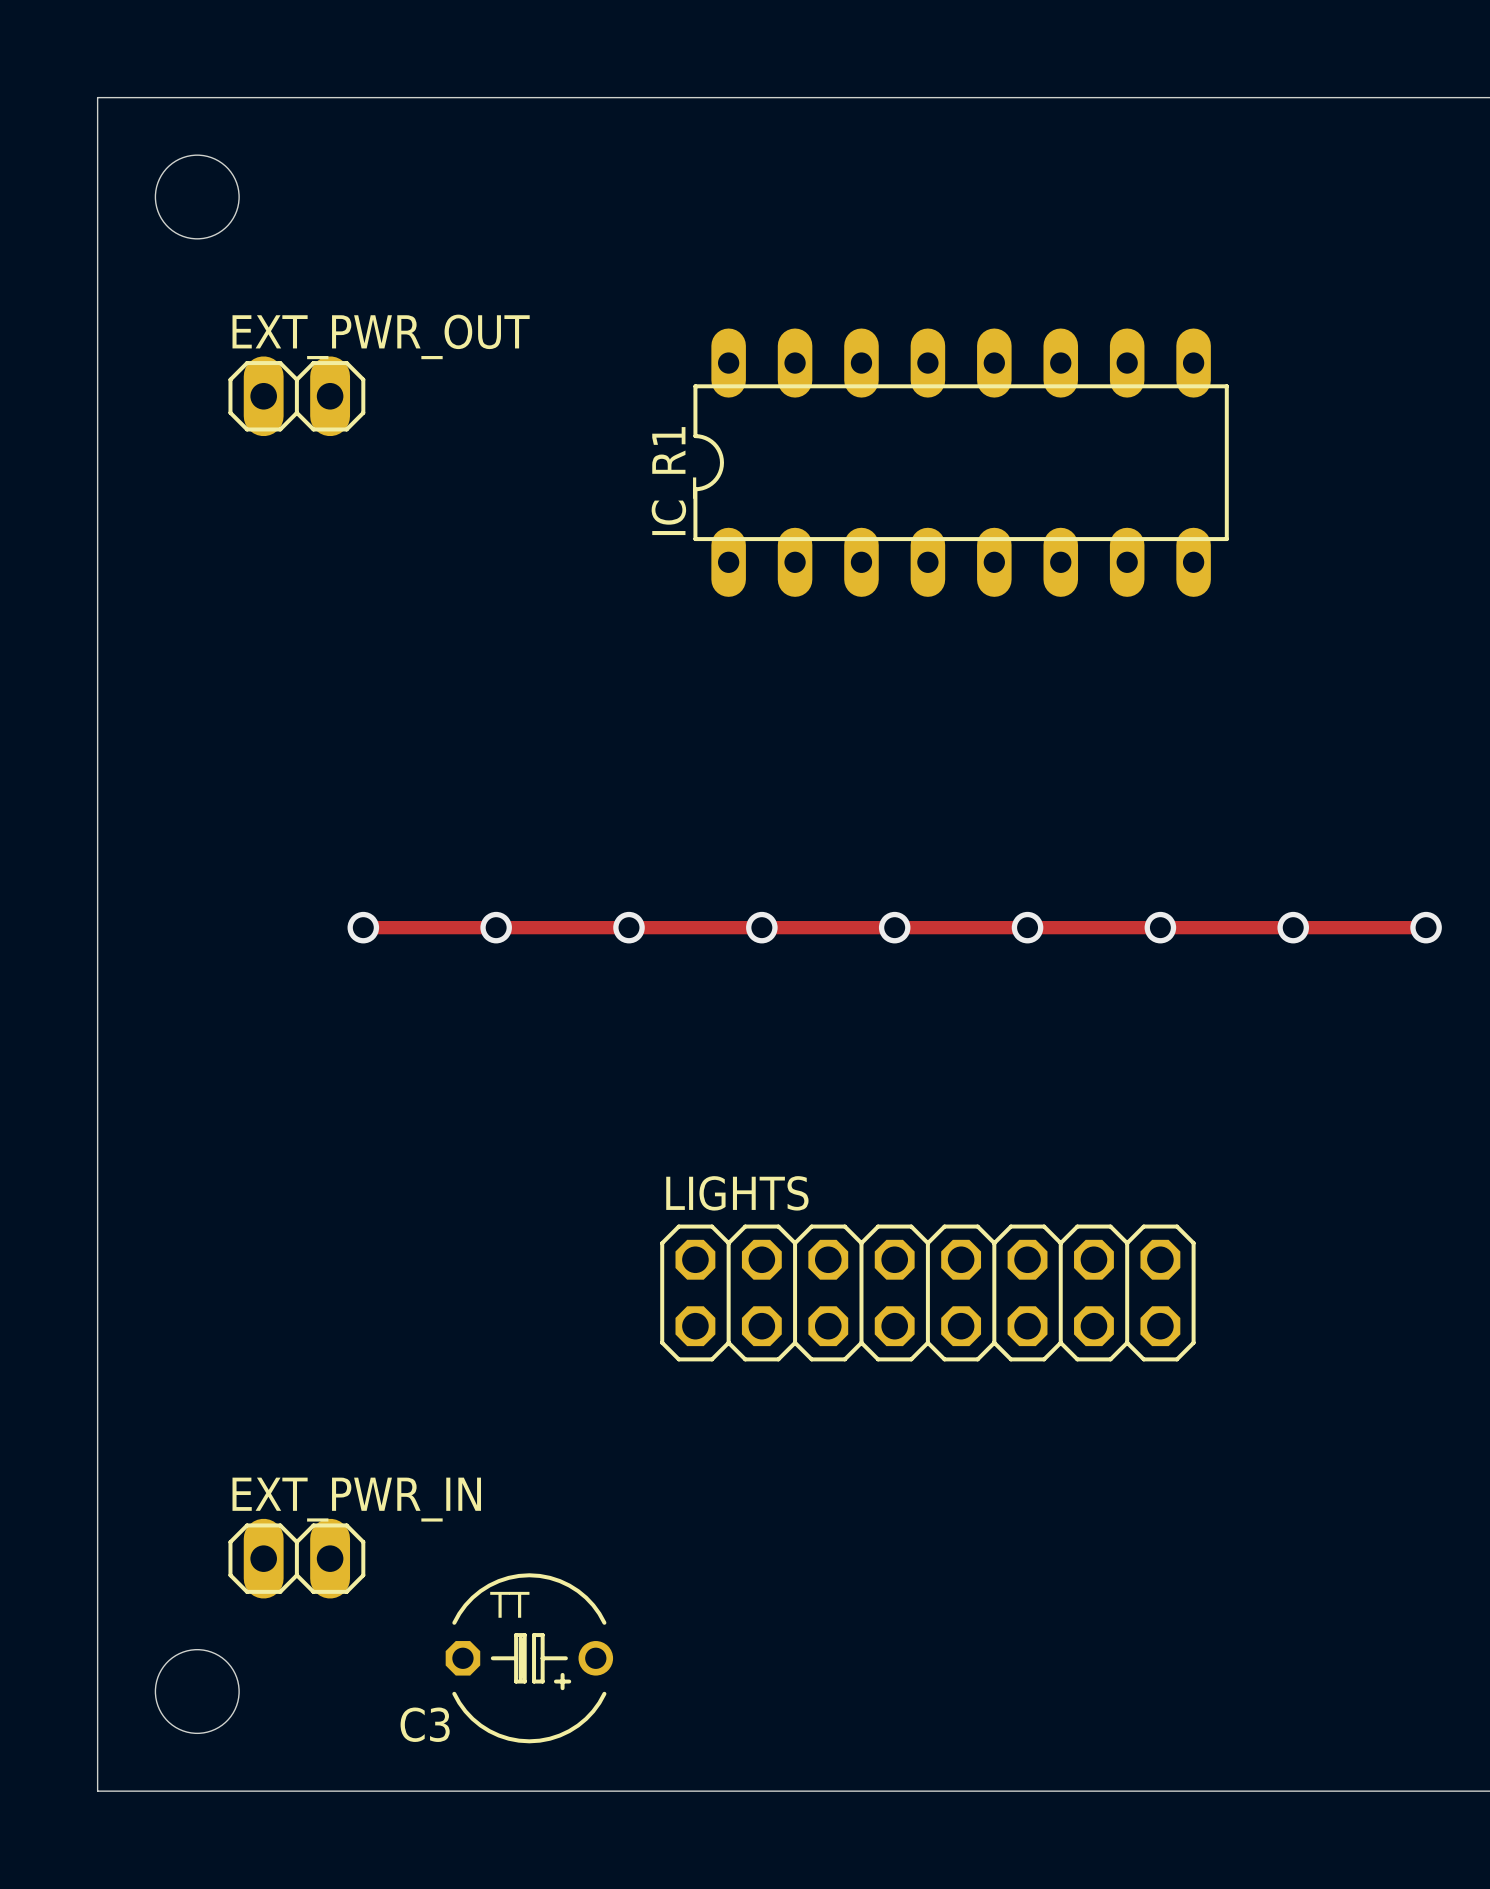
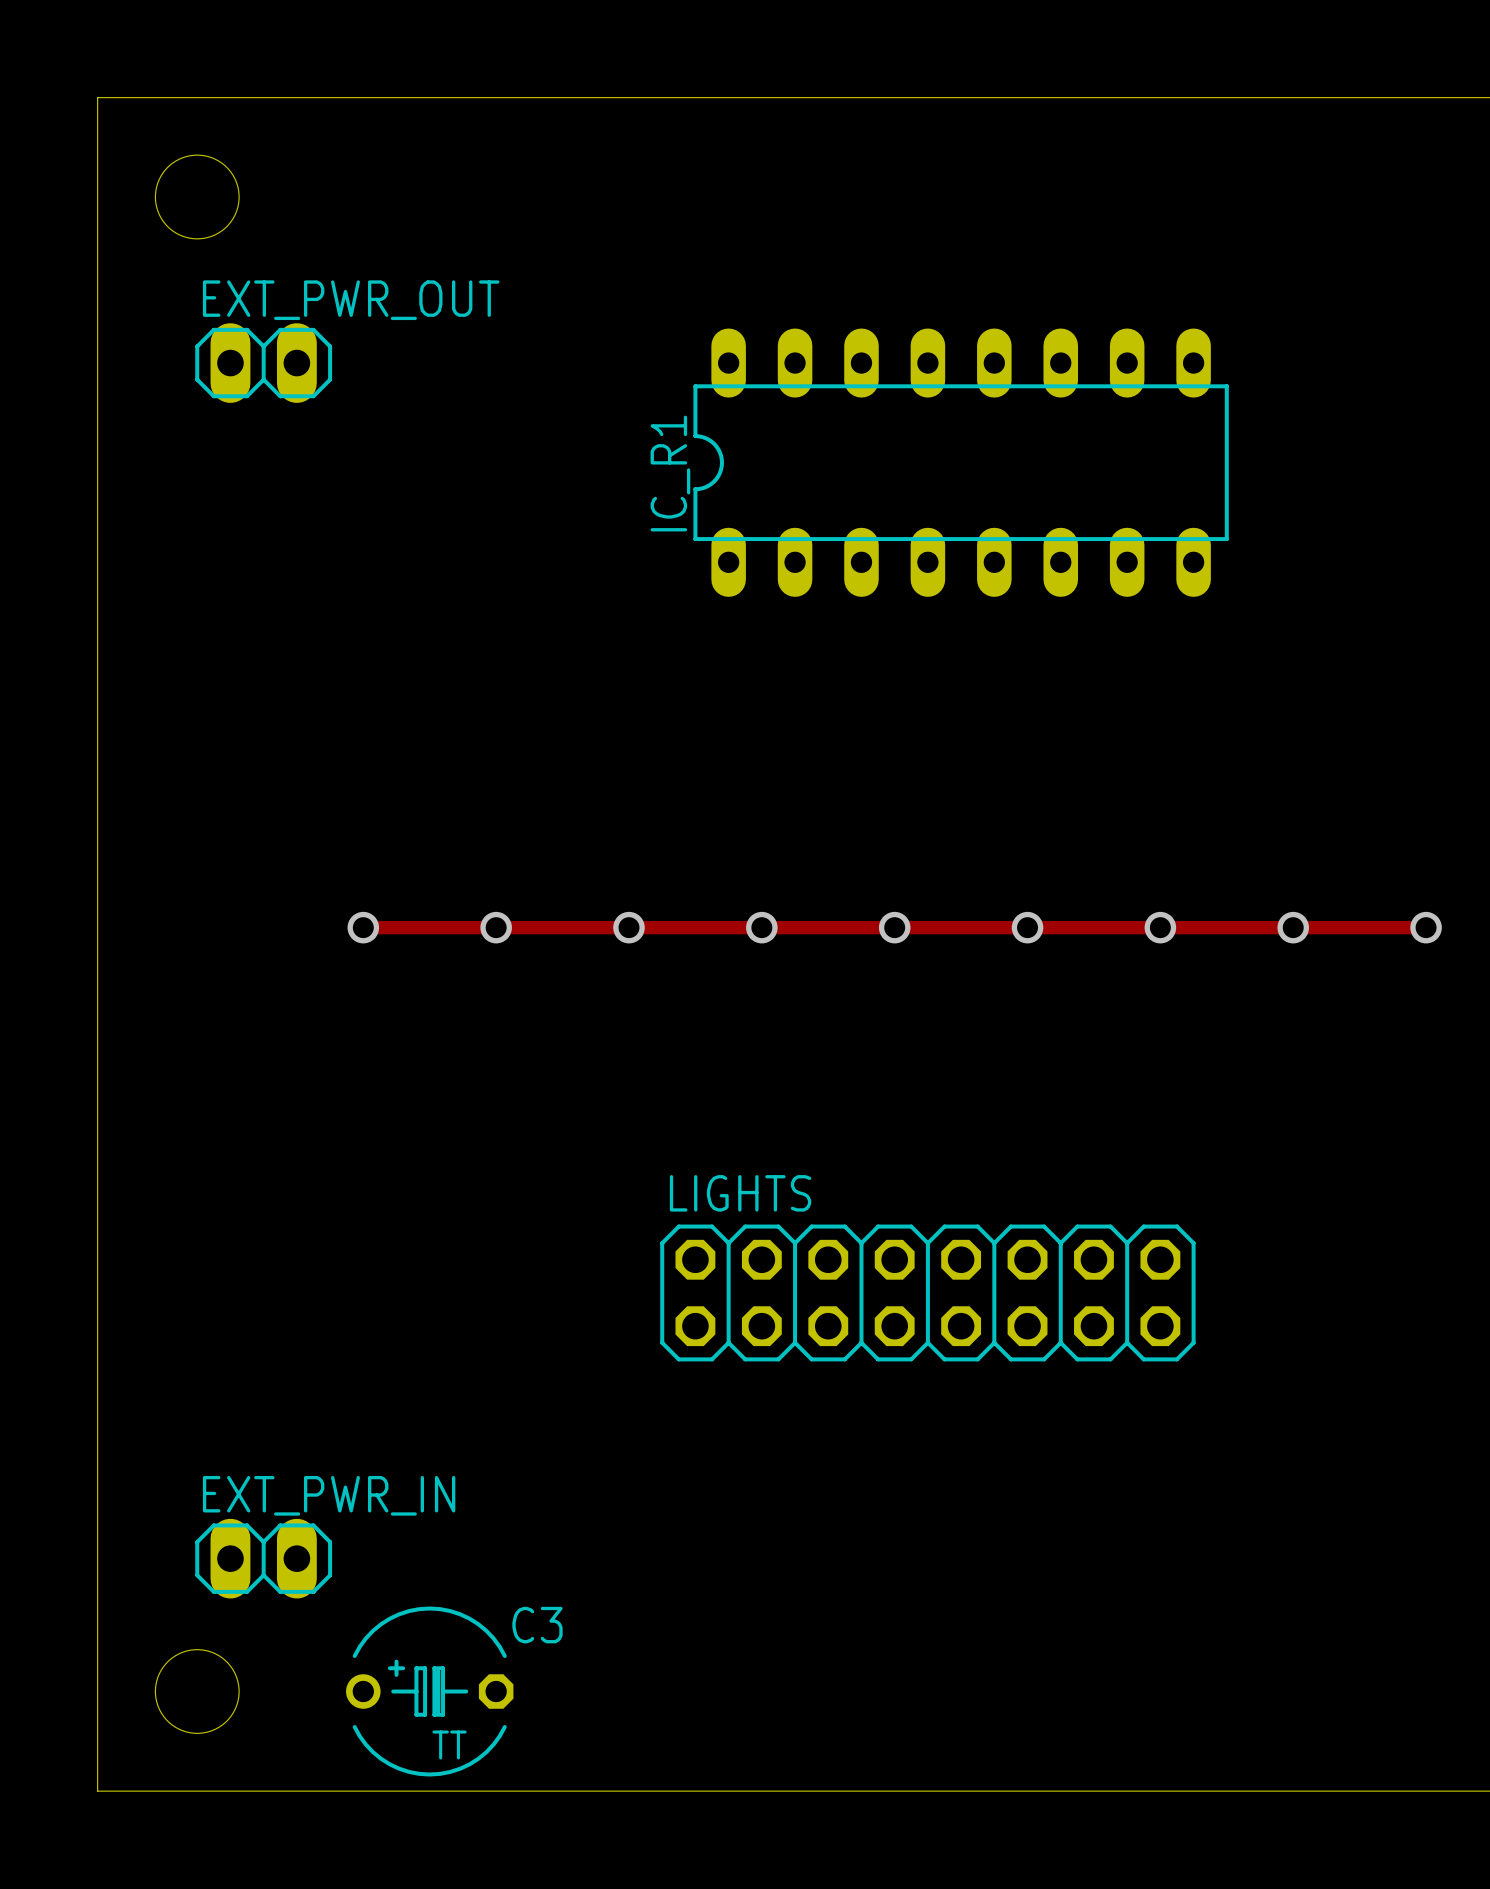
EXT_PWR_OUT position: (296, 396) -> (263, 363)
EXT_PWR_IN position: (296, 1558) -> (263, 1558)
C3 footprint: [445, 1573, 614, 1744] -> [346, 1606, 514, 1777]
C3 name position: C3 (425, 1724) -> C3 (537, 1625)

